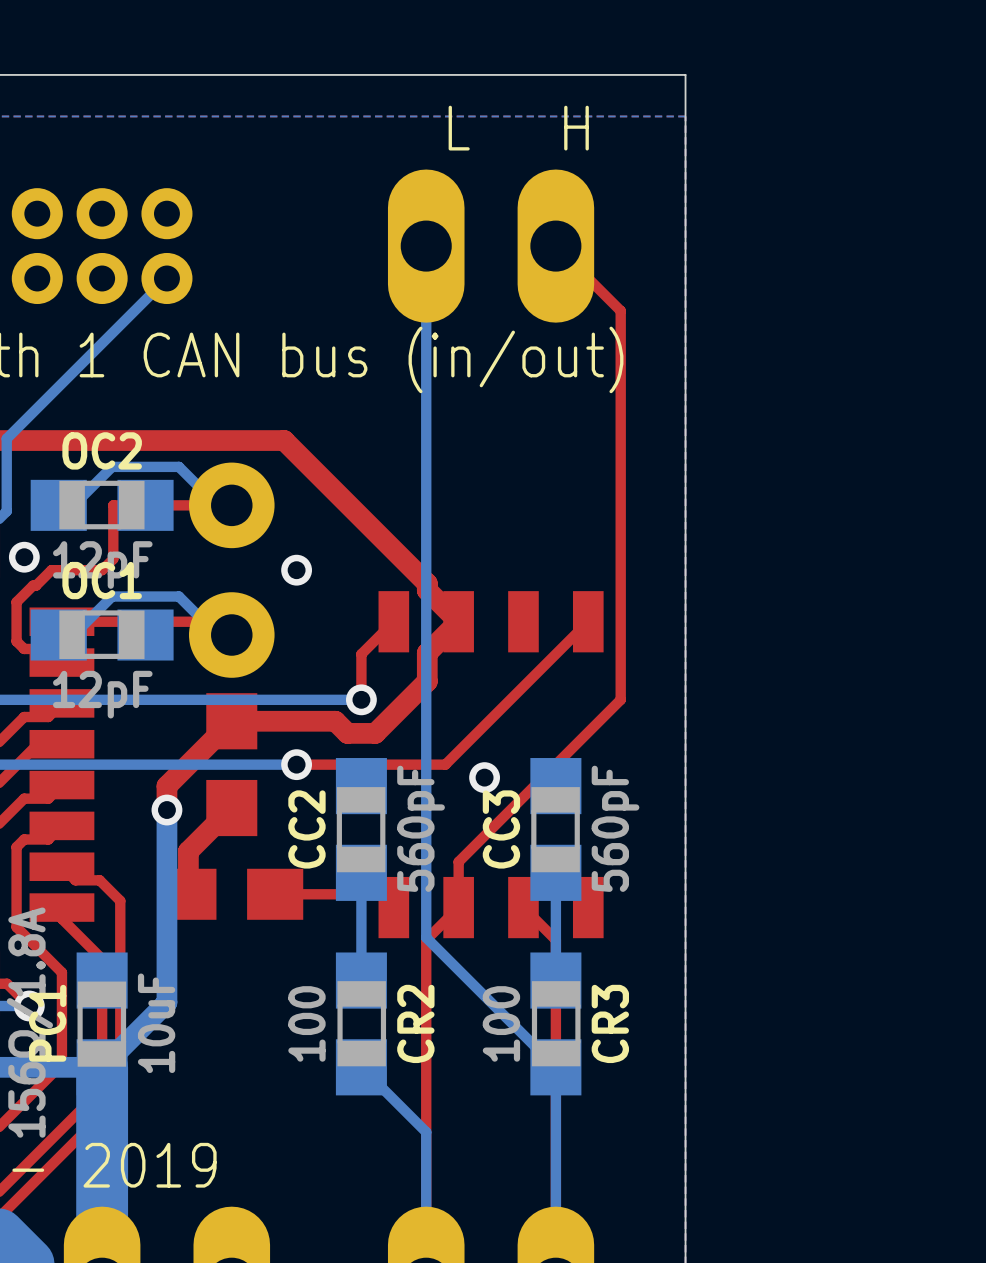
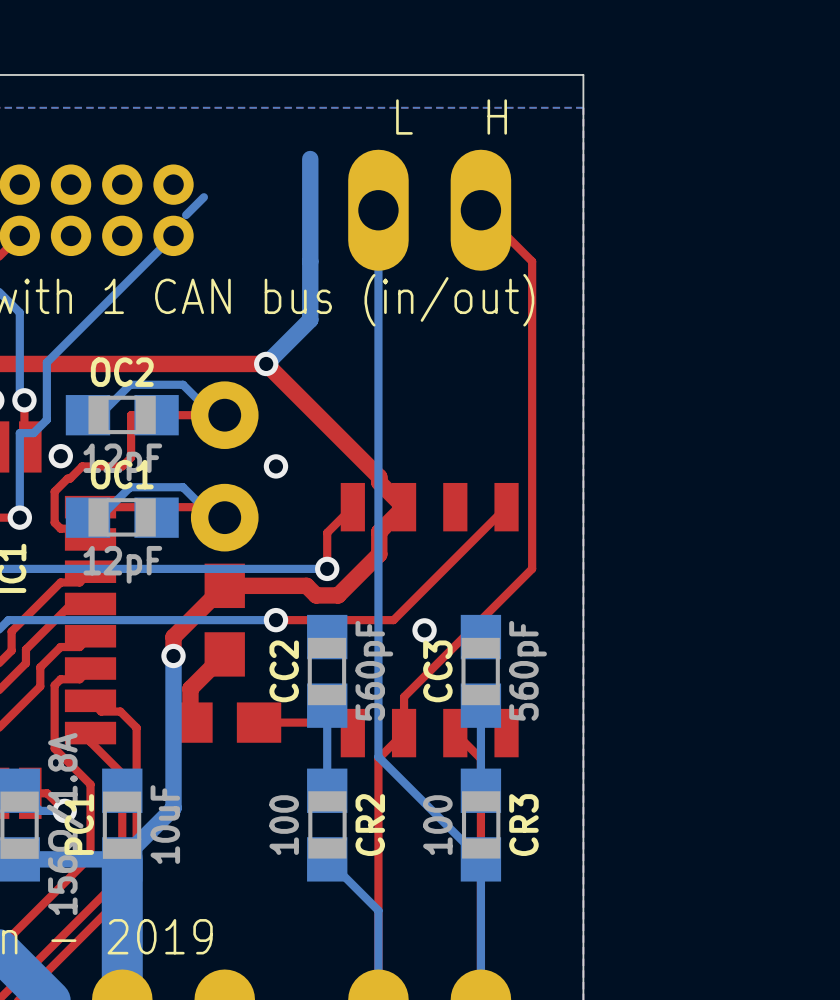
bottom track: none -> (310, 159) (310, 319) (266, 363)
bottom track: none -> (203, 197) (186, 215)
via: none -> (266, 363)

